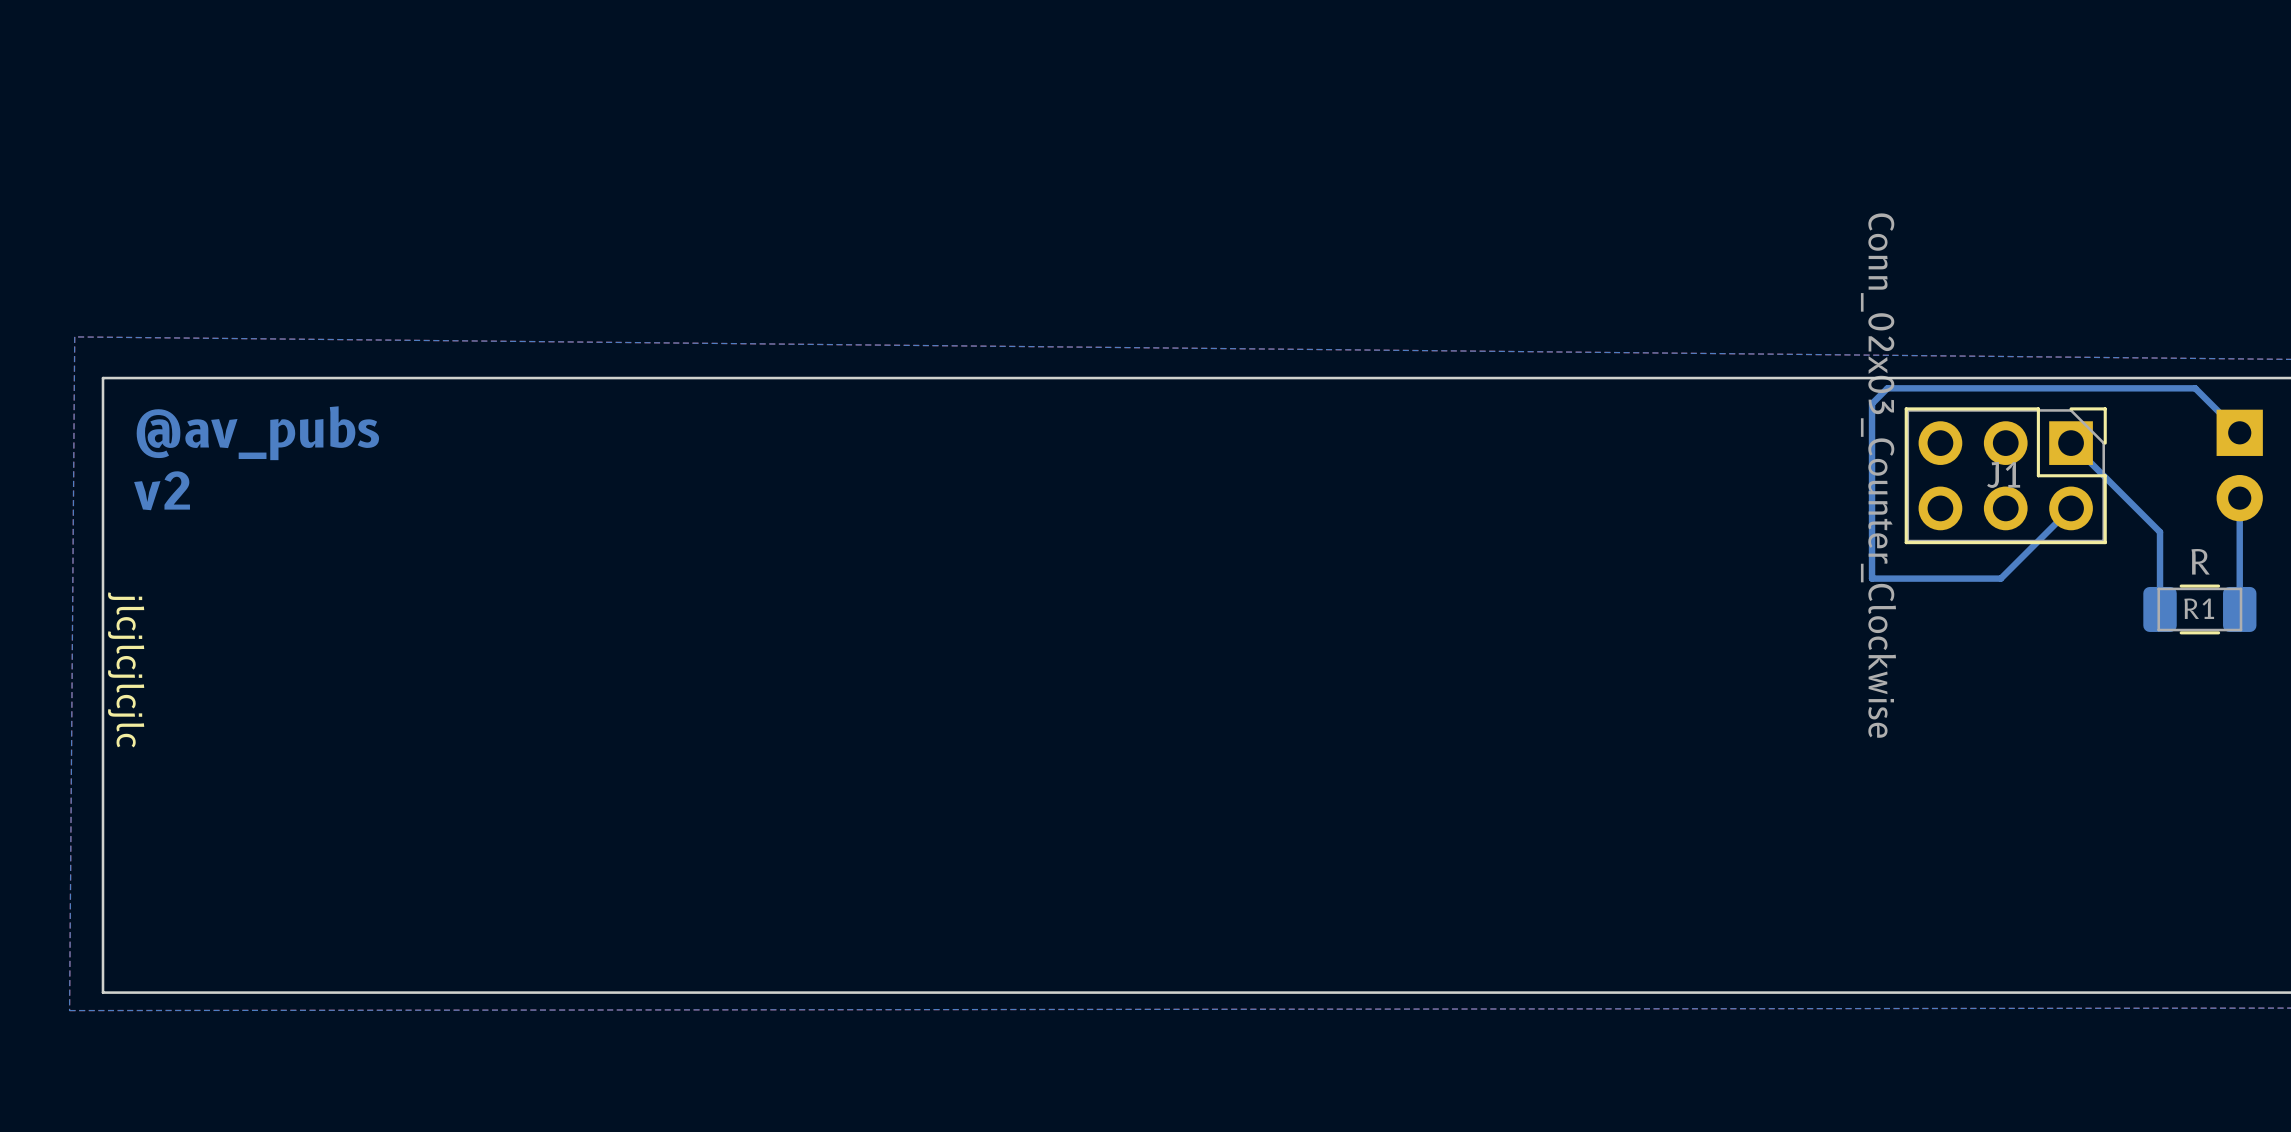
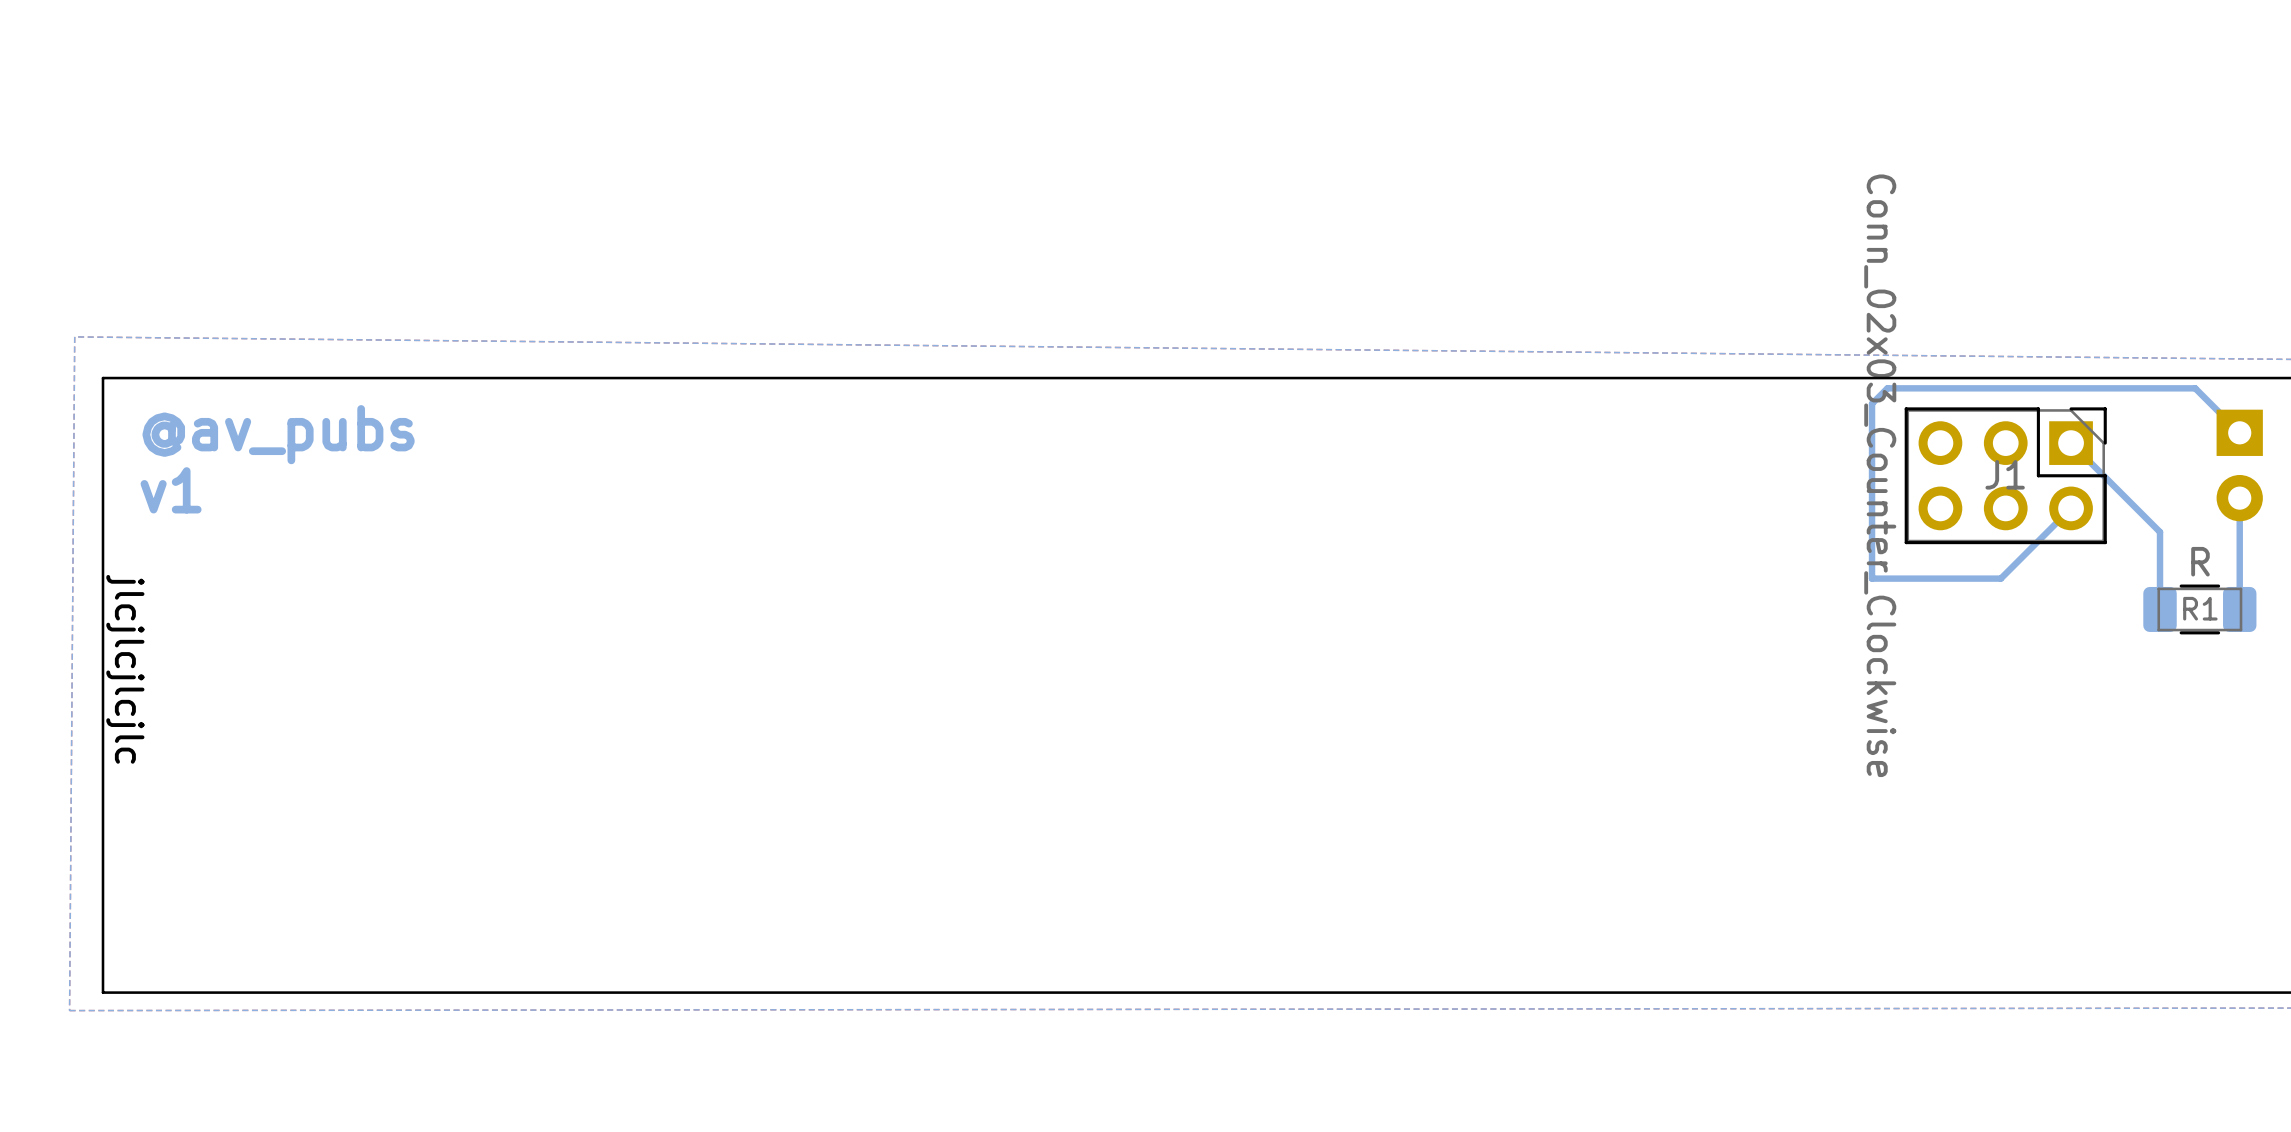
text: v2 (162, 490) -> v1 (171, 490)

